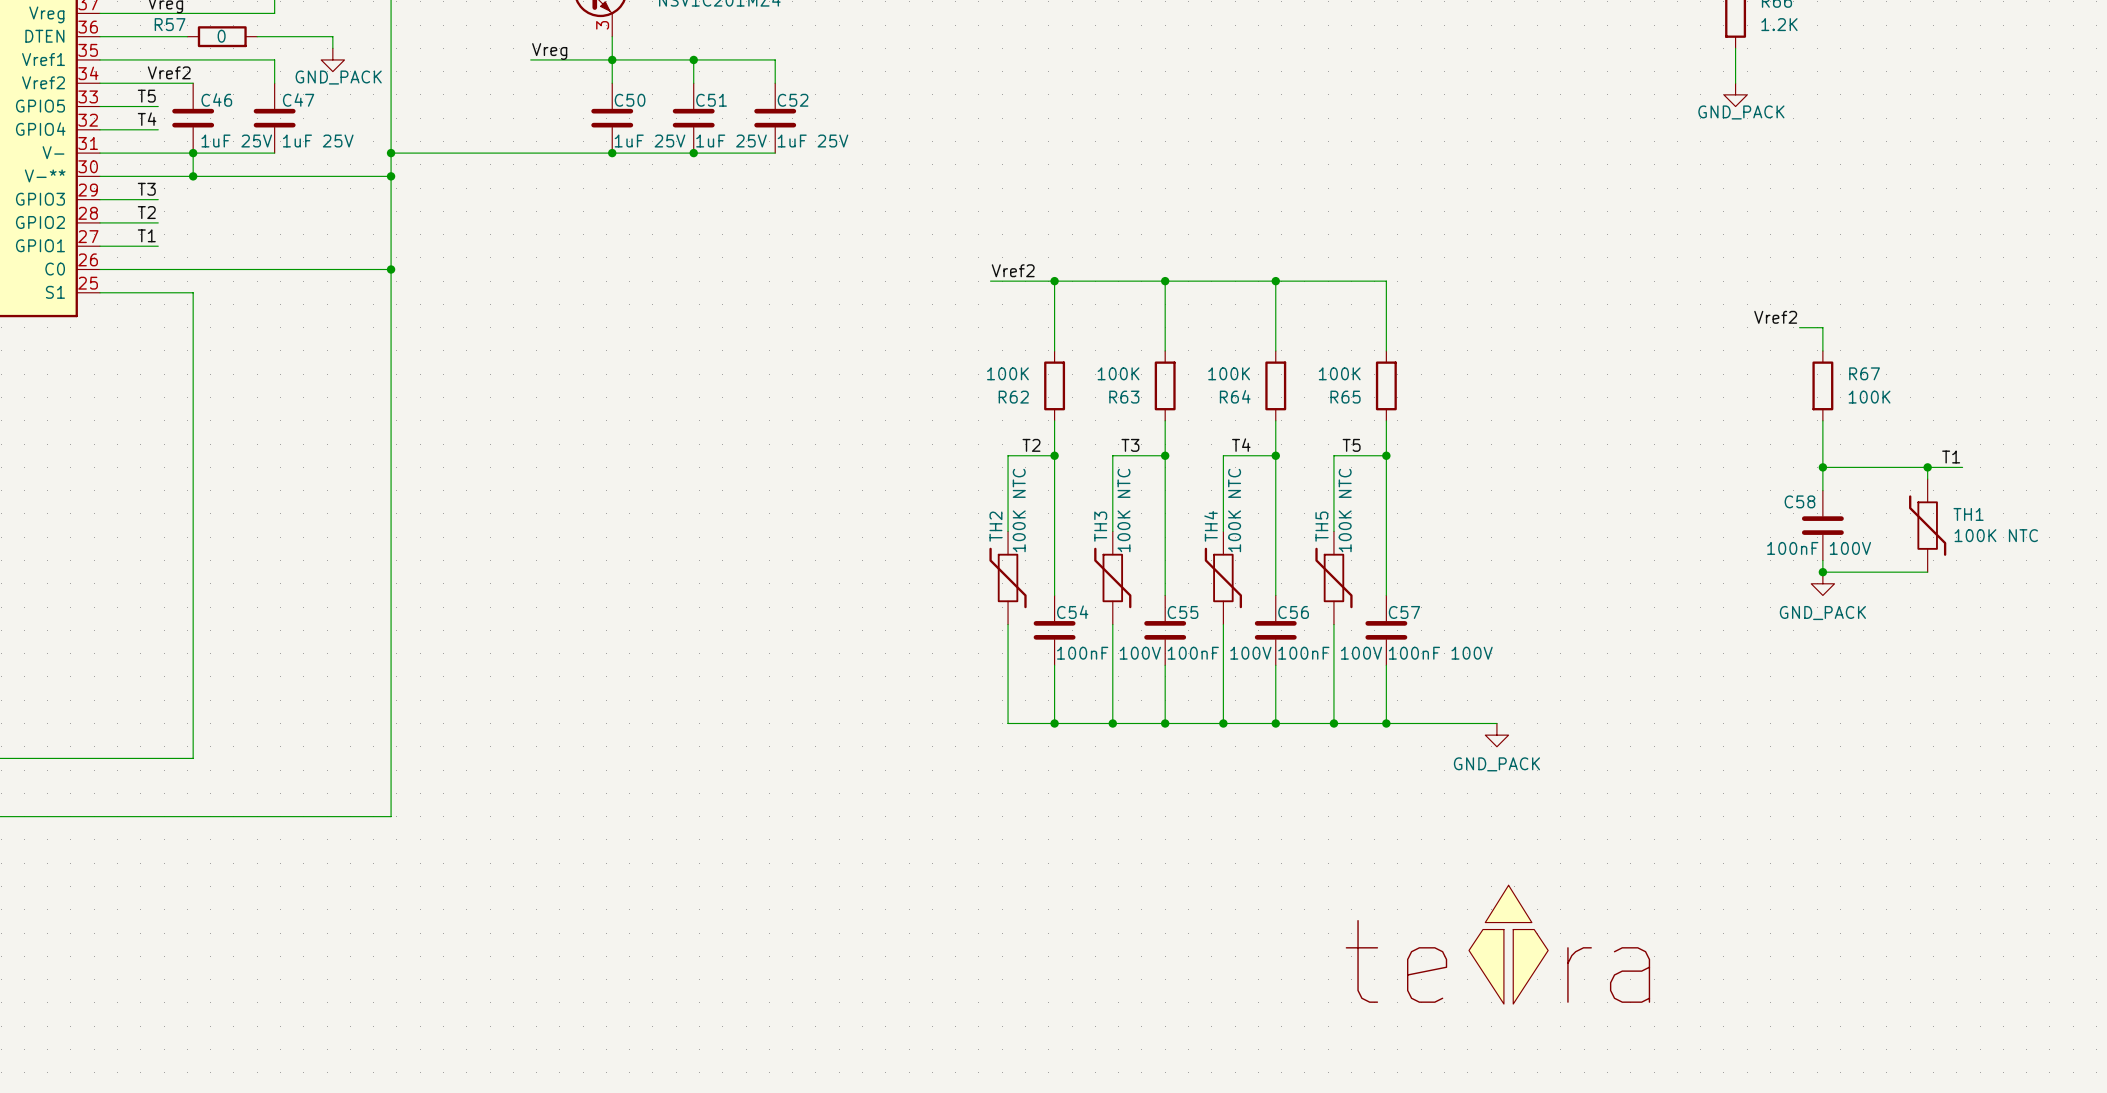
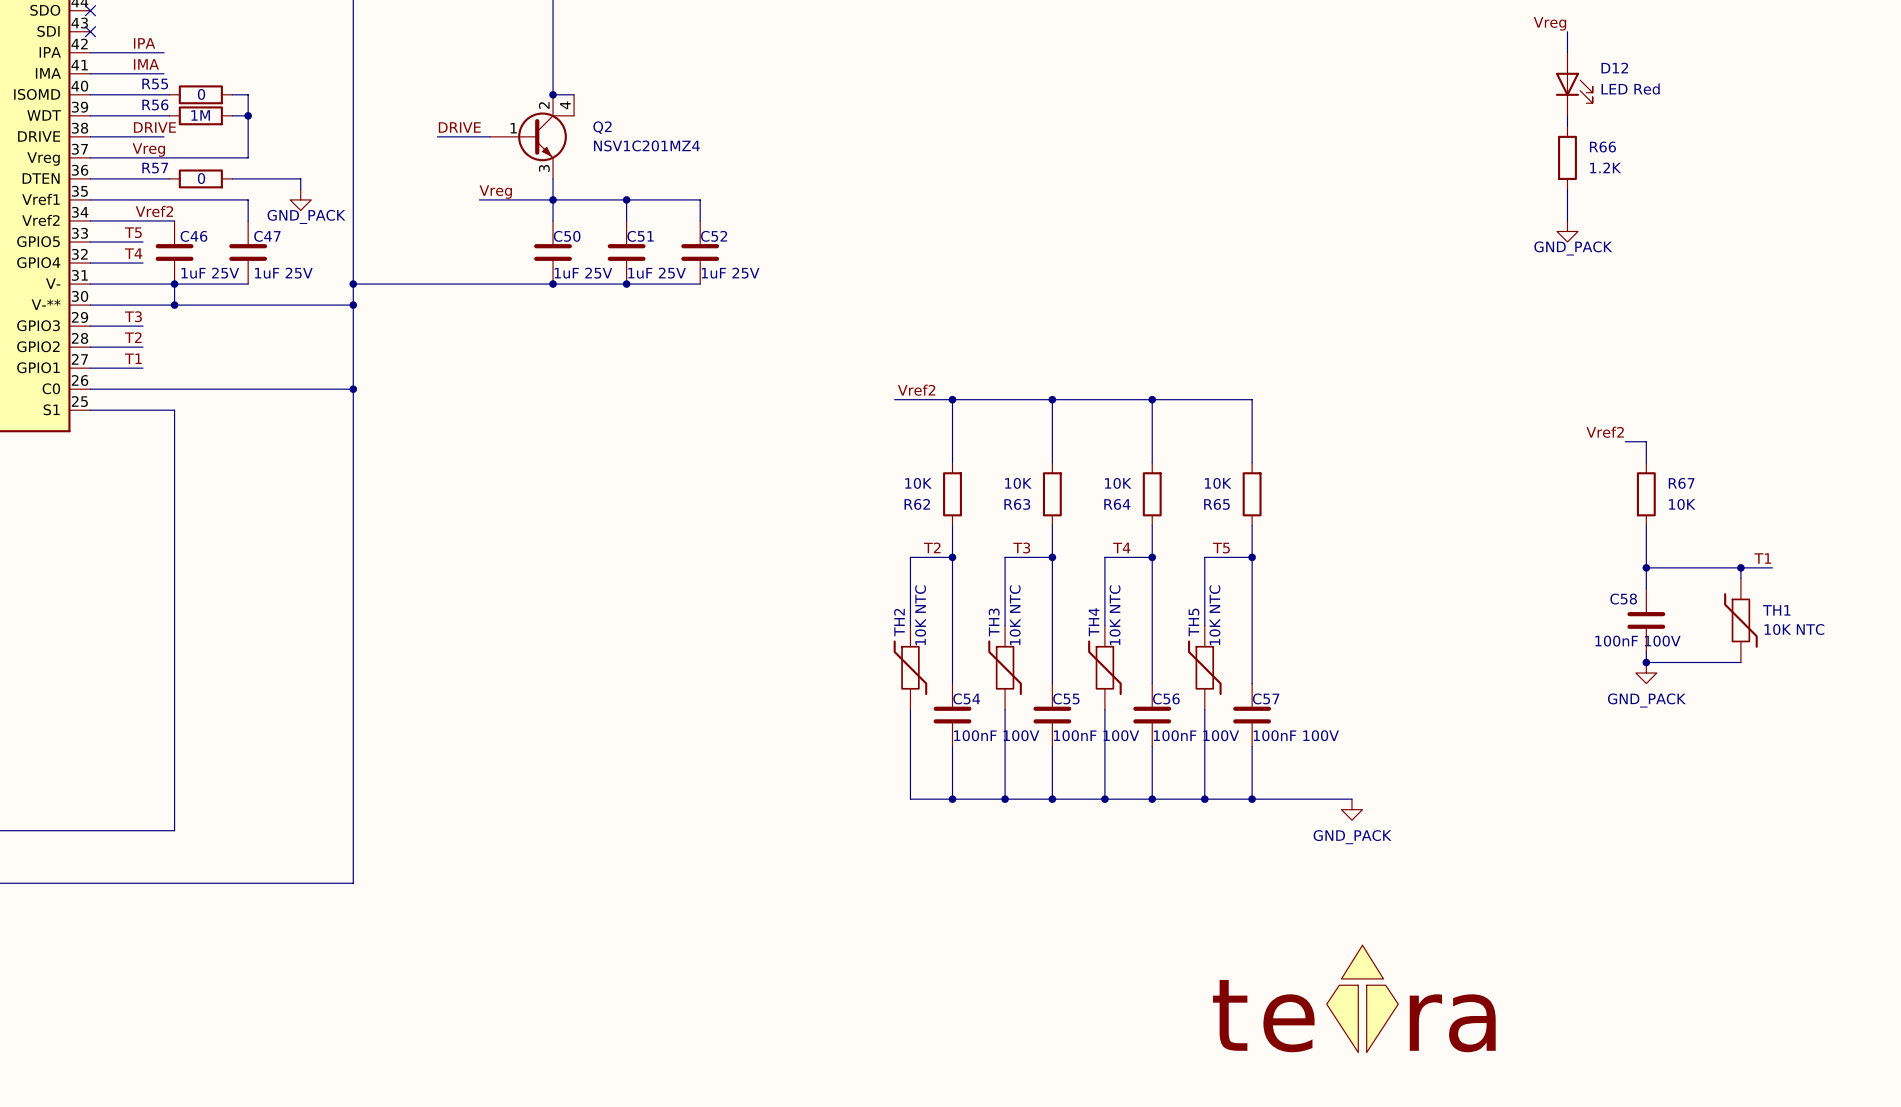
R62 value: 100K (1007, 373) -> 10K (918, 483)
R63 value: 100K (1118, 373) -> 10K (1018, 483)
R64 value: 100K (1229, 373) -> 10K (1118, 483)
R65 value: 100K (1339, 373) -> 10K (1218, 483)
R67 value: 100K (1869, 397) -> 10K (1682, 504)
TH2 value: 100K NTC (1019, 510) -> 10K NTC (920, 615)
TH3 value: 100K NTC (1124, 510) -> 10K NTC (1015, 615)
TH4 value: 100K NTC (1234, 510) -> 10K NTC (1115, 615)
TH5 value: 100K NTC (1345, 510) -> 10K NTC (1214, 615)
TH1 value: 100K NTC (1996, 535) -> 10K NTC (1794, 629)

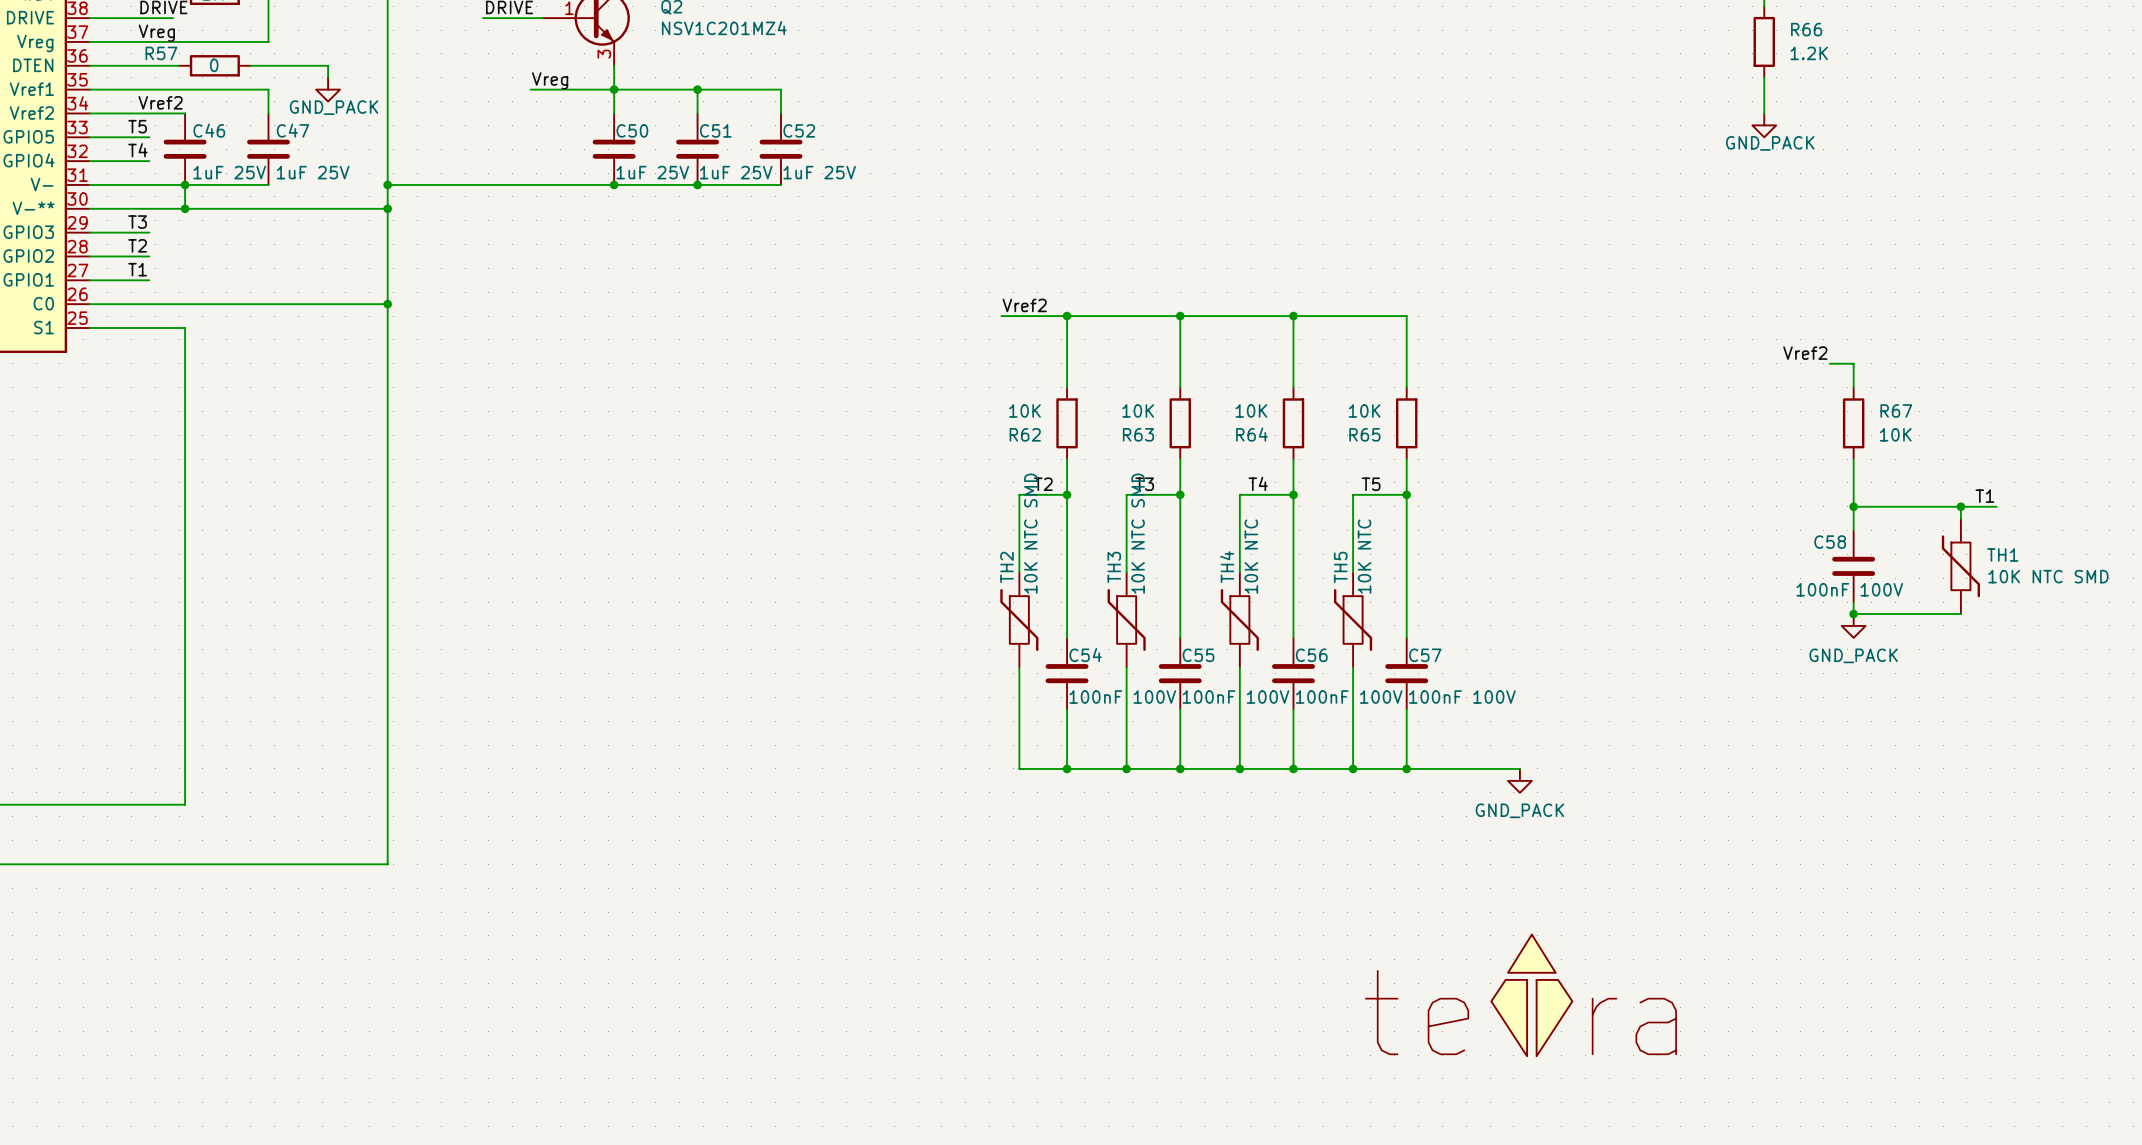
TH2 value: 10K NTC (920, 615) -> 10K NTC SMD (1030, 533)
TH3 value: 10K NTC (1015, 615) -> 10K NTC SMD (1138, 533)
TH1 value: 10K NTC (1794, 629) -> 10K NTC SMD (2048, 576)

